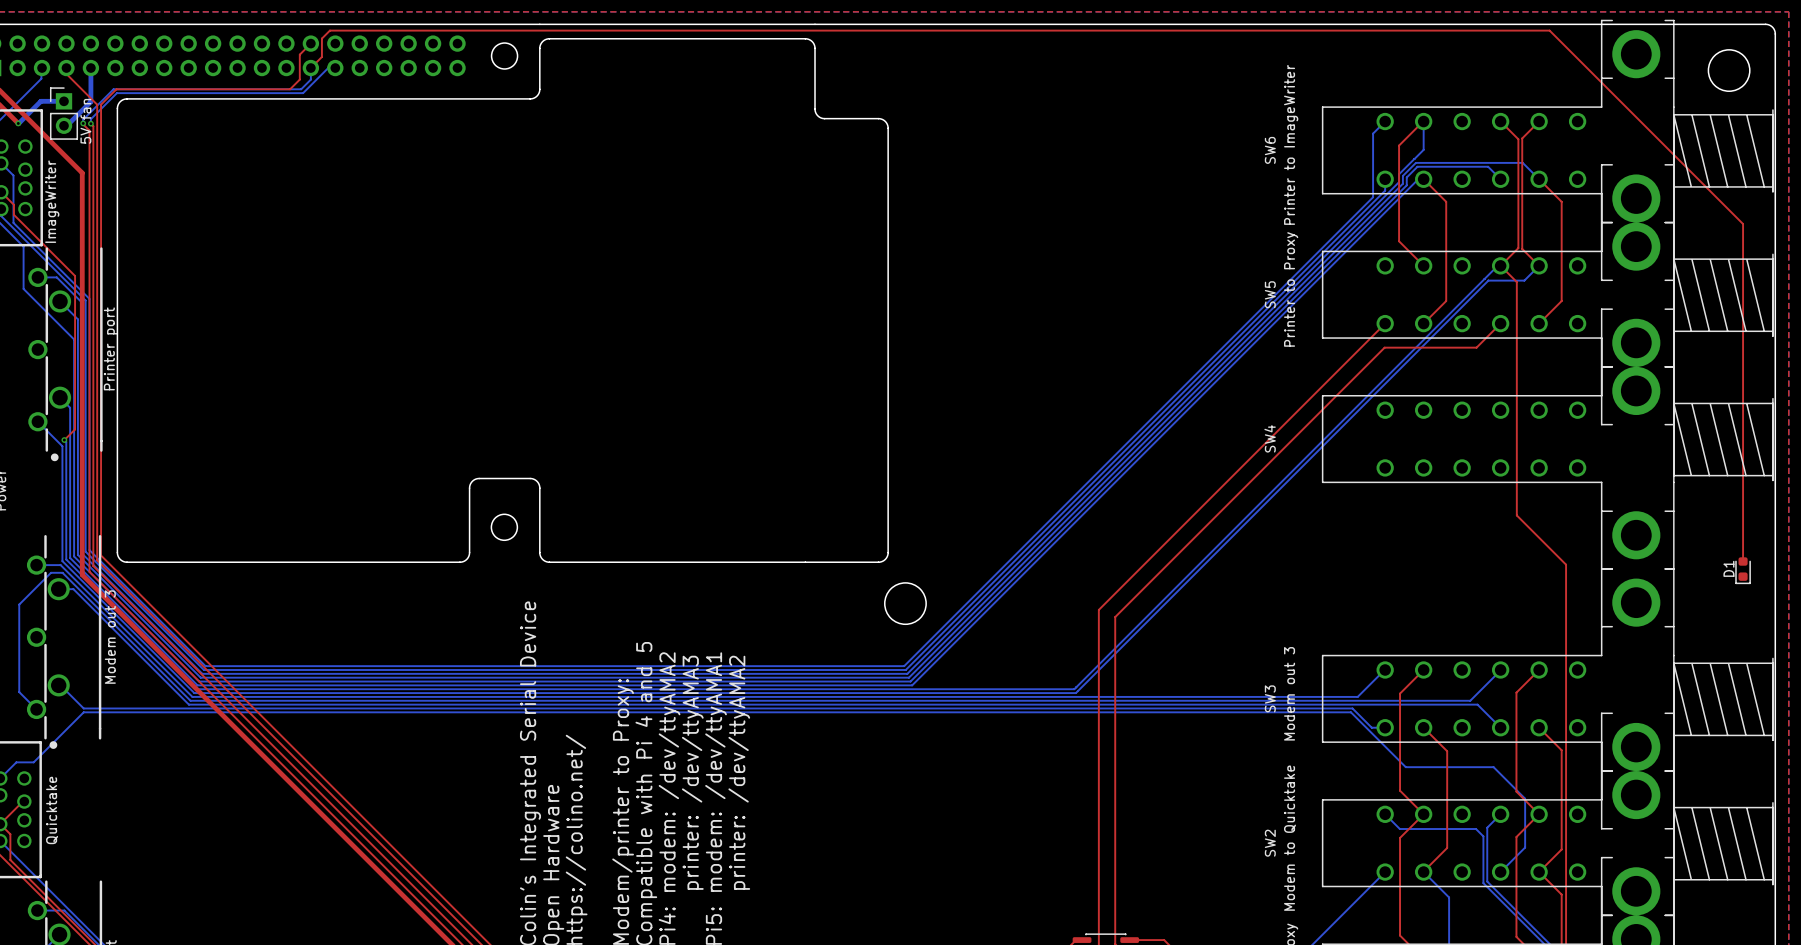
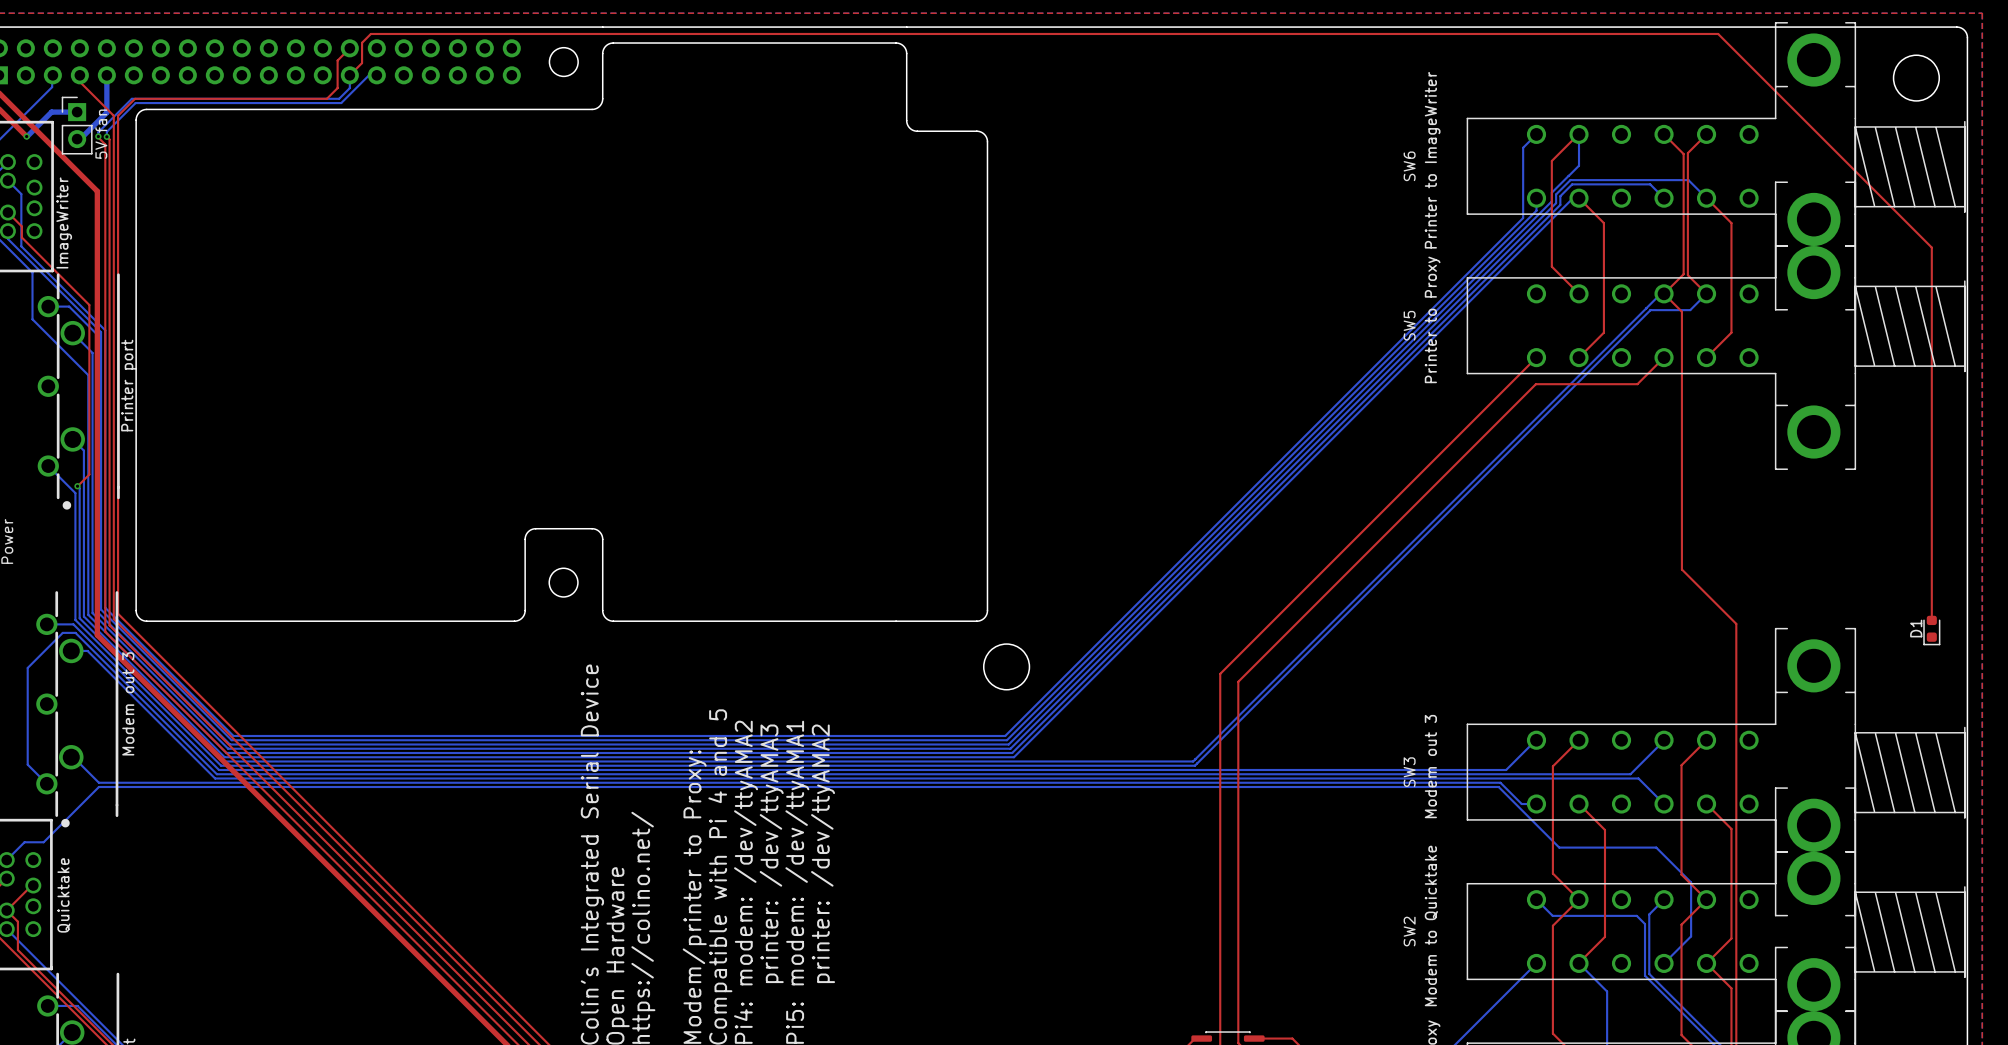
SW4: (1547, 439) -> none

